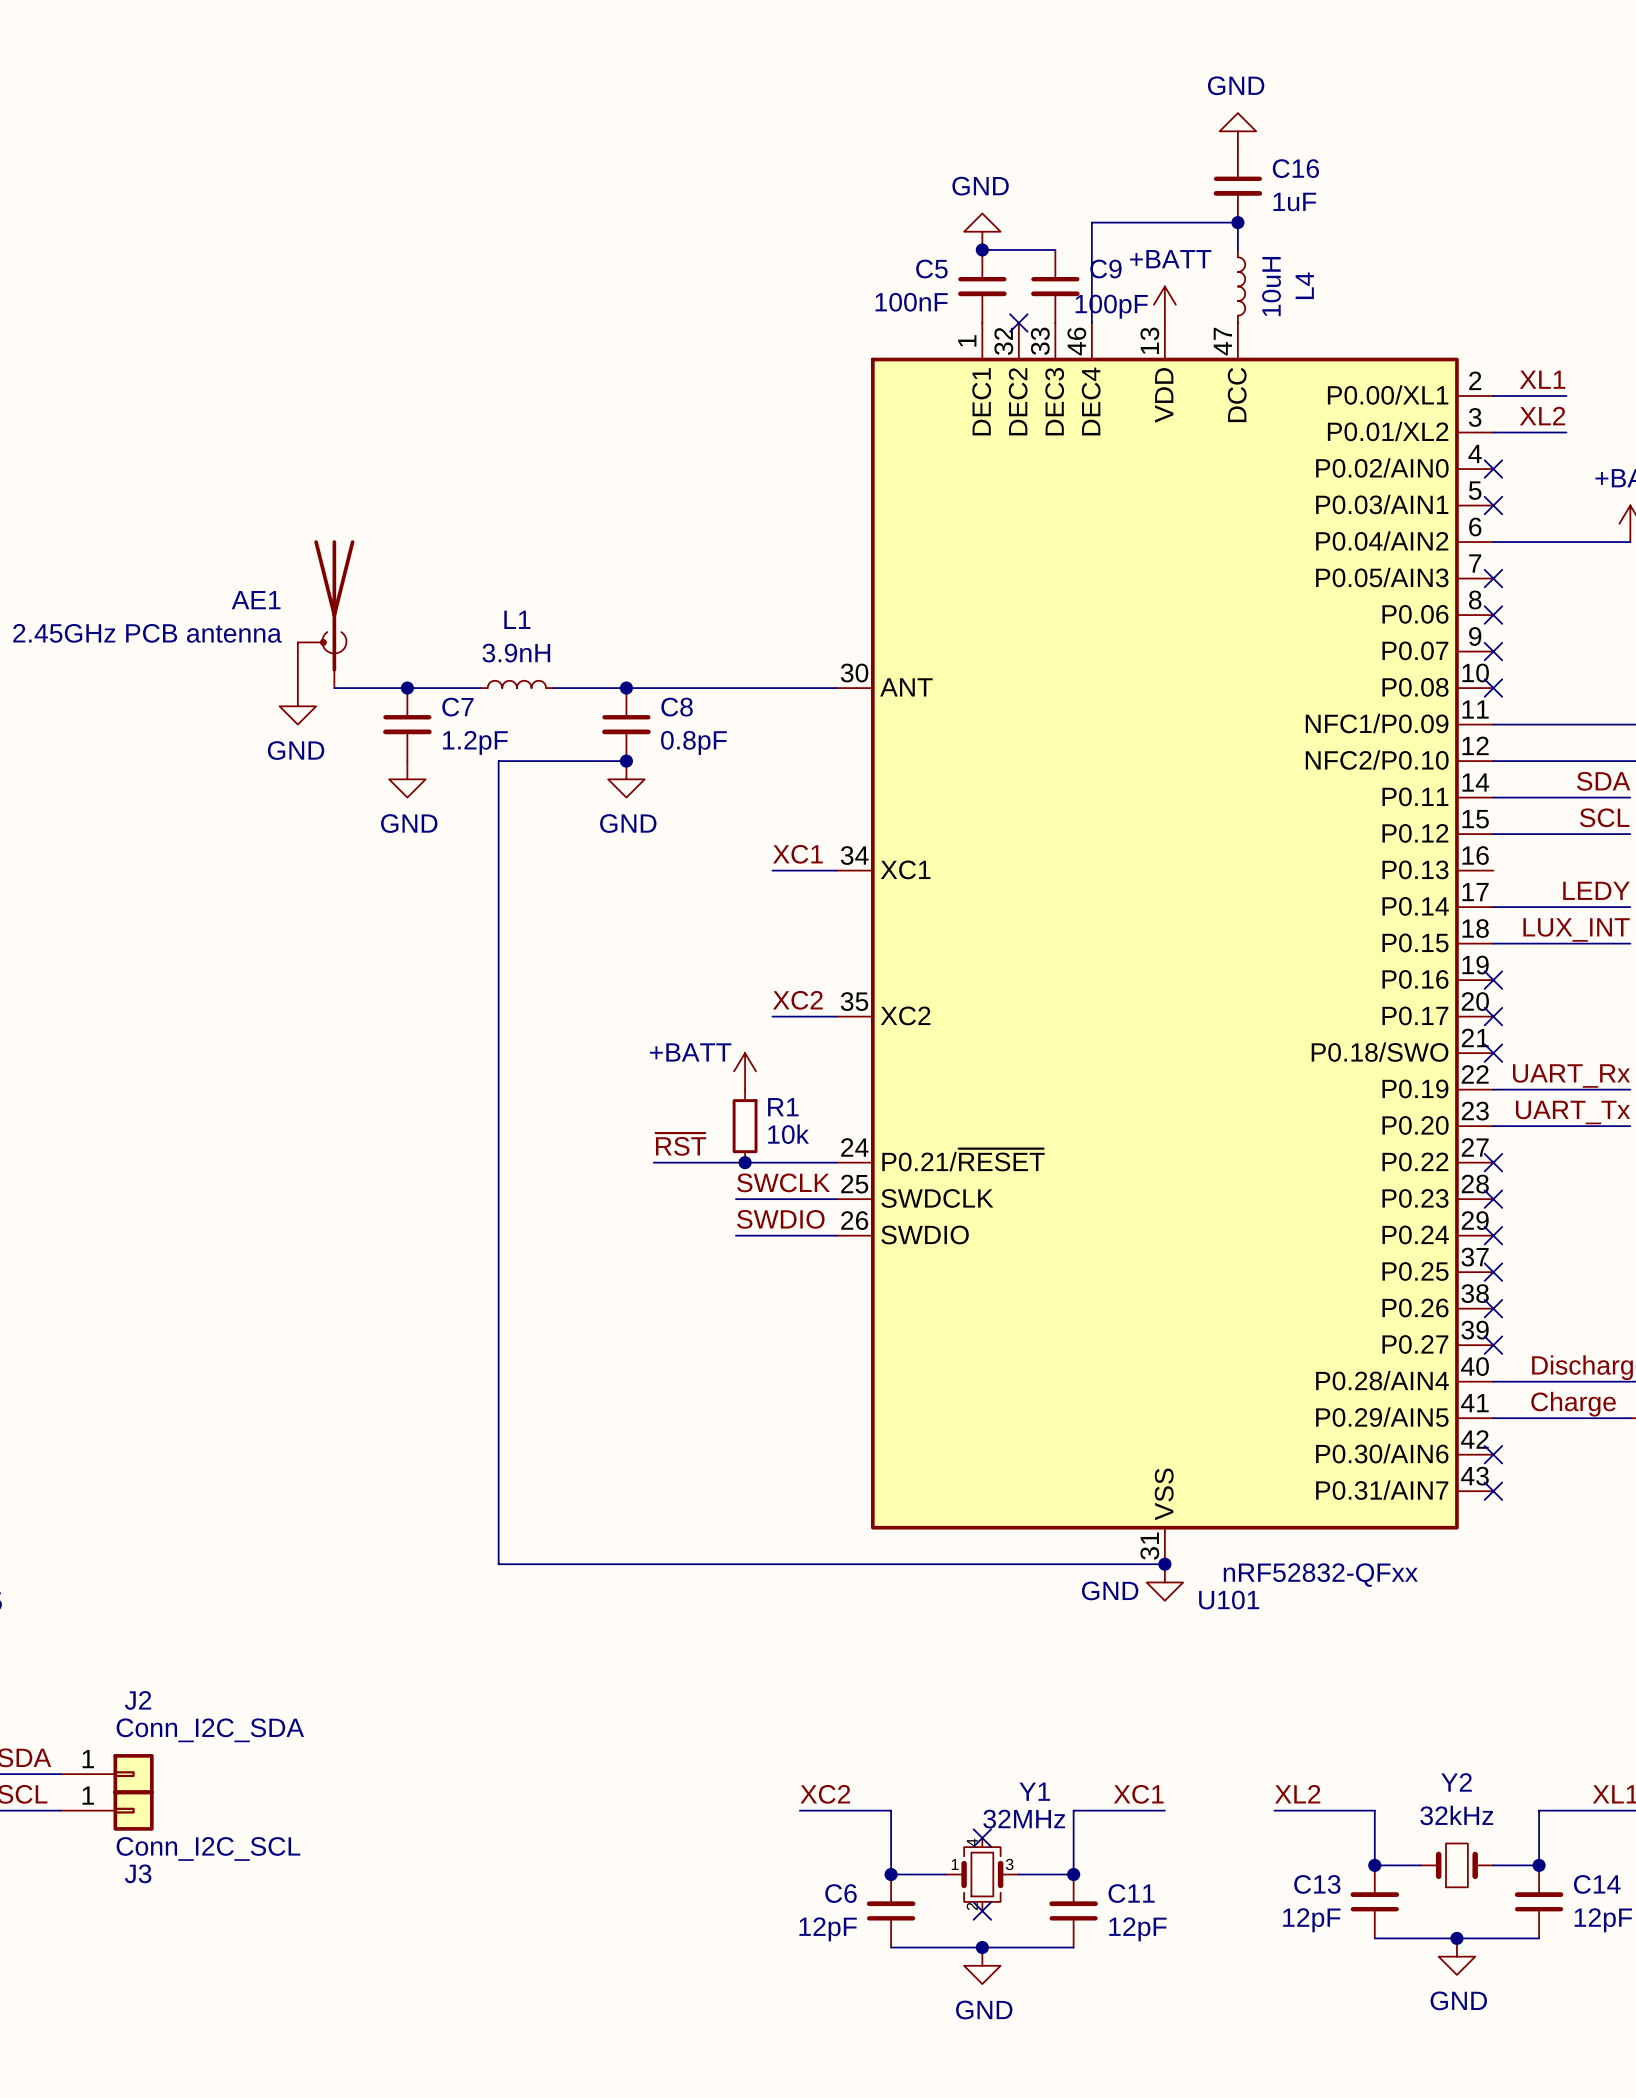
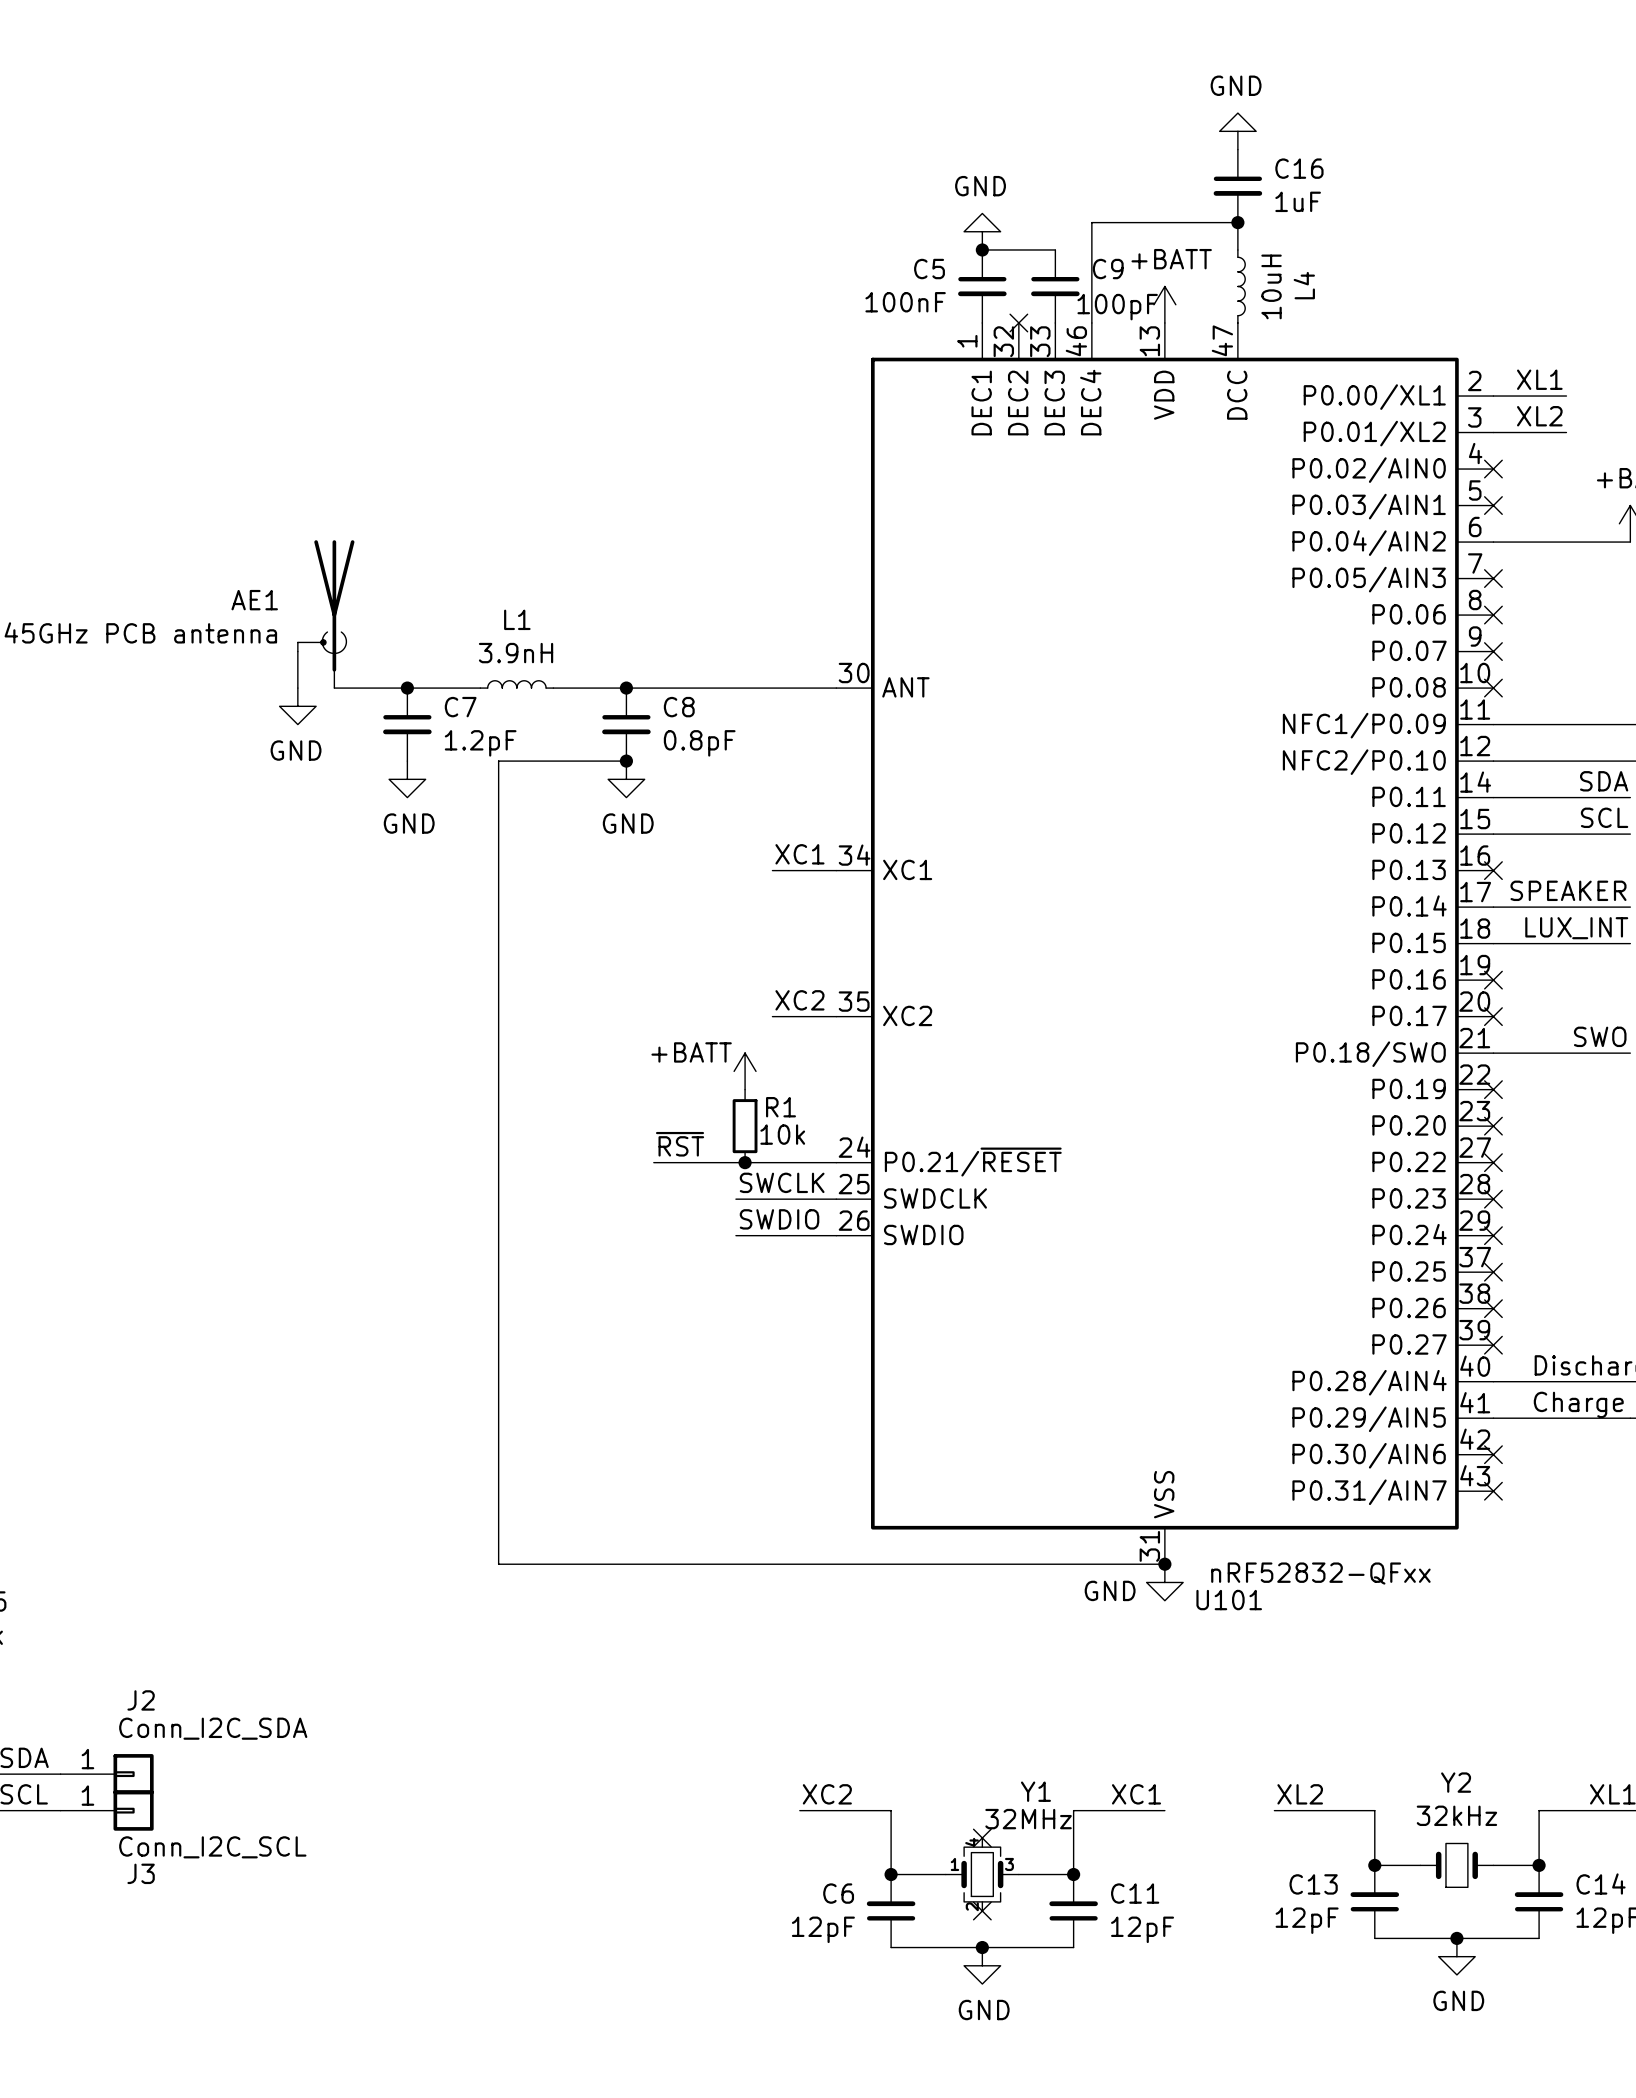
no-connect mark: none -> (1493, 870)
label: LEDY (1596, 890) -> SPEAKER (1568, 890)
label: none -> SWO (1600, 1036)
no-connect mark: (1493, 1053) -> none
label: UART_Rx (1571, 1075) -> none
wire: (1493, 1089) (1630, 1089) -> (1493, 1053) (1630, 1053)
no-connect mark: none -> (1493, 1089)
label: UART_Tx (1573, 1112) -> none
wire: (1493, 1126) (1630, 1126) -> none
no-connect mark: none -> (1493, 1126)

